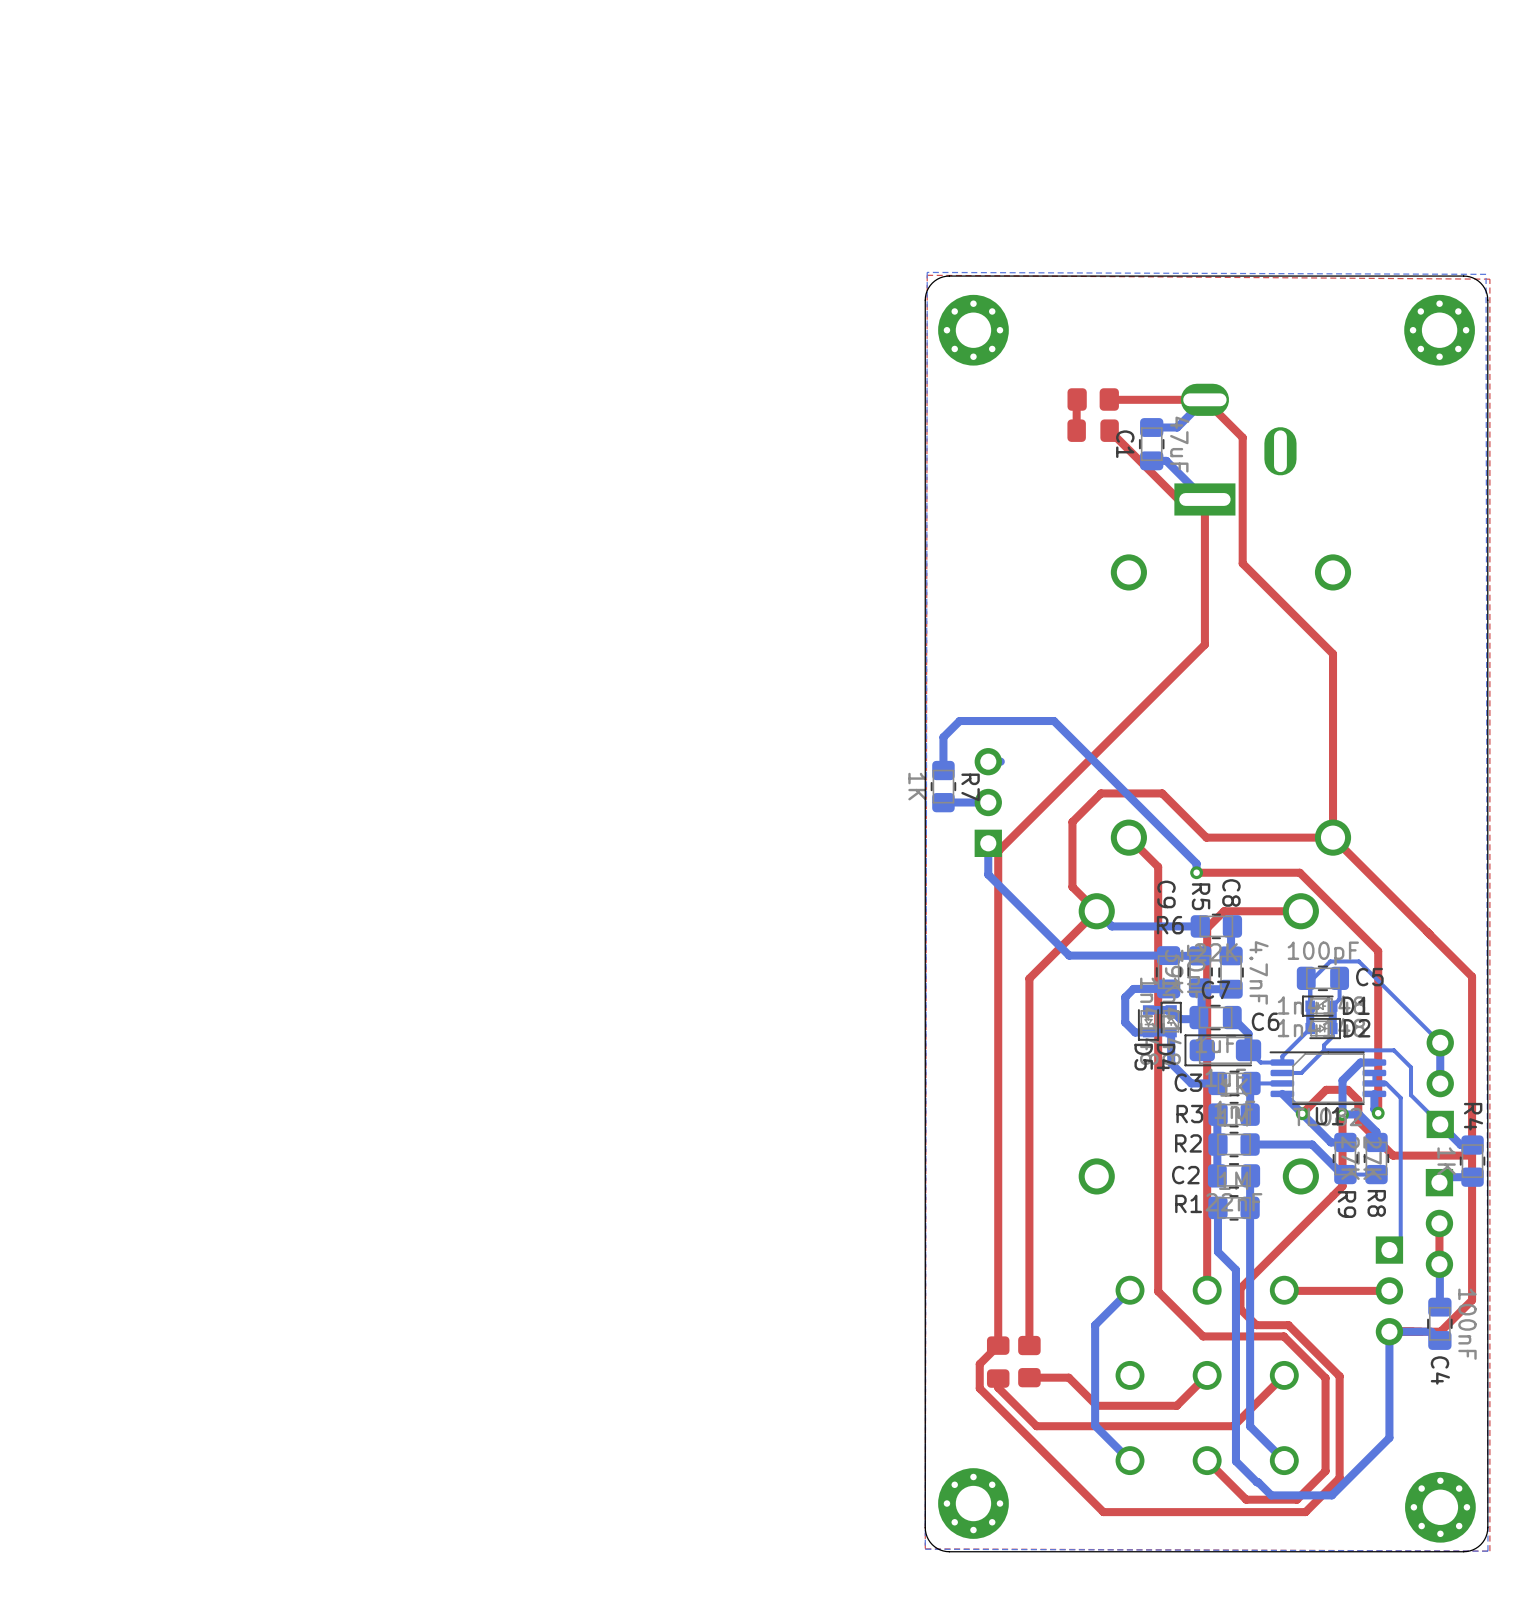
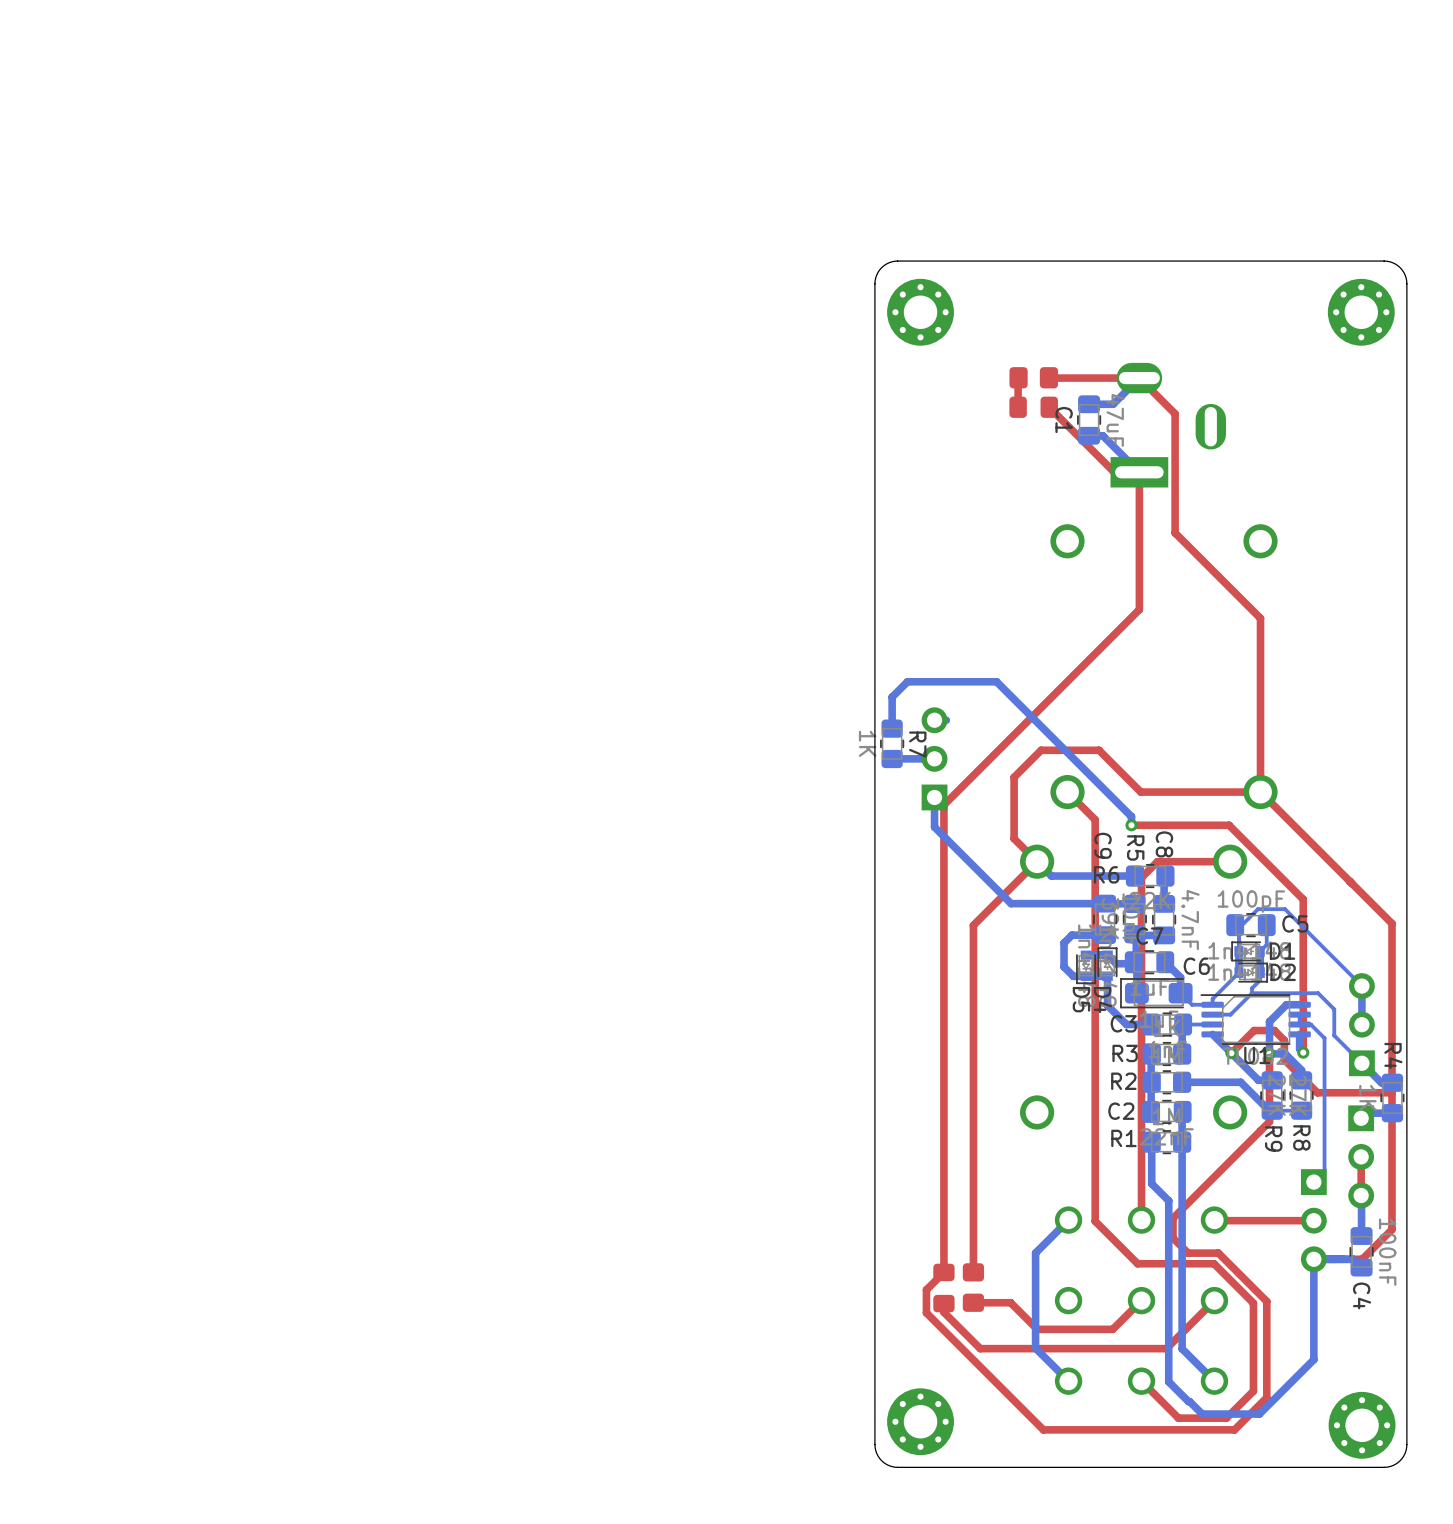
bottom zone outline: (927, 272) (1486, 274) (1487, 1551) (925, 1549) (927, 272) -> none
top zone outline: (927, 275) (1489, 279) (1489, 1551) (925, 1548) (927, 275) -> none

